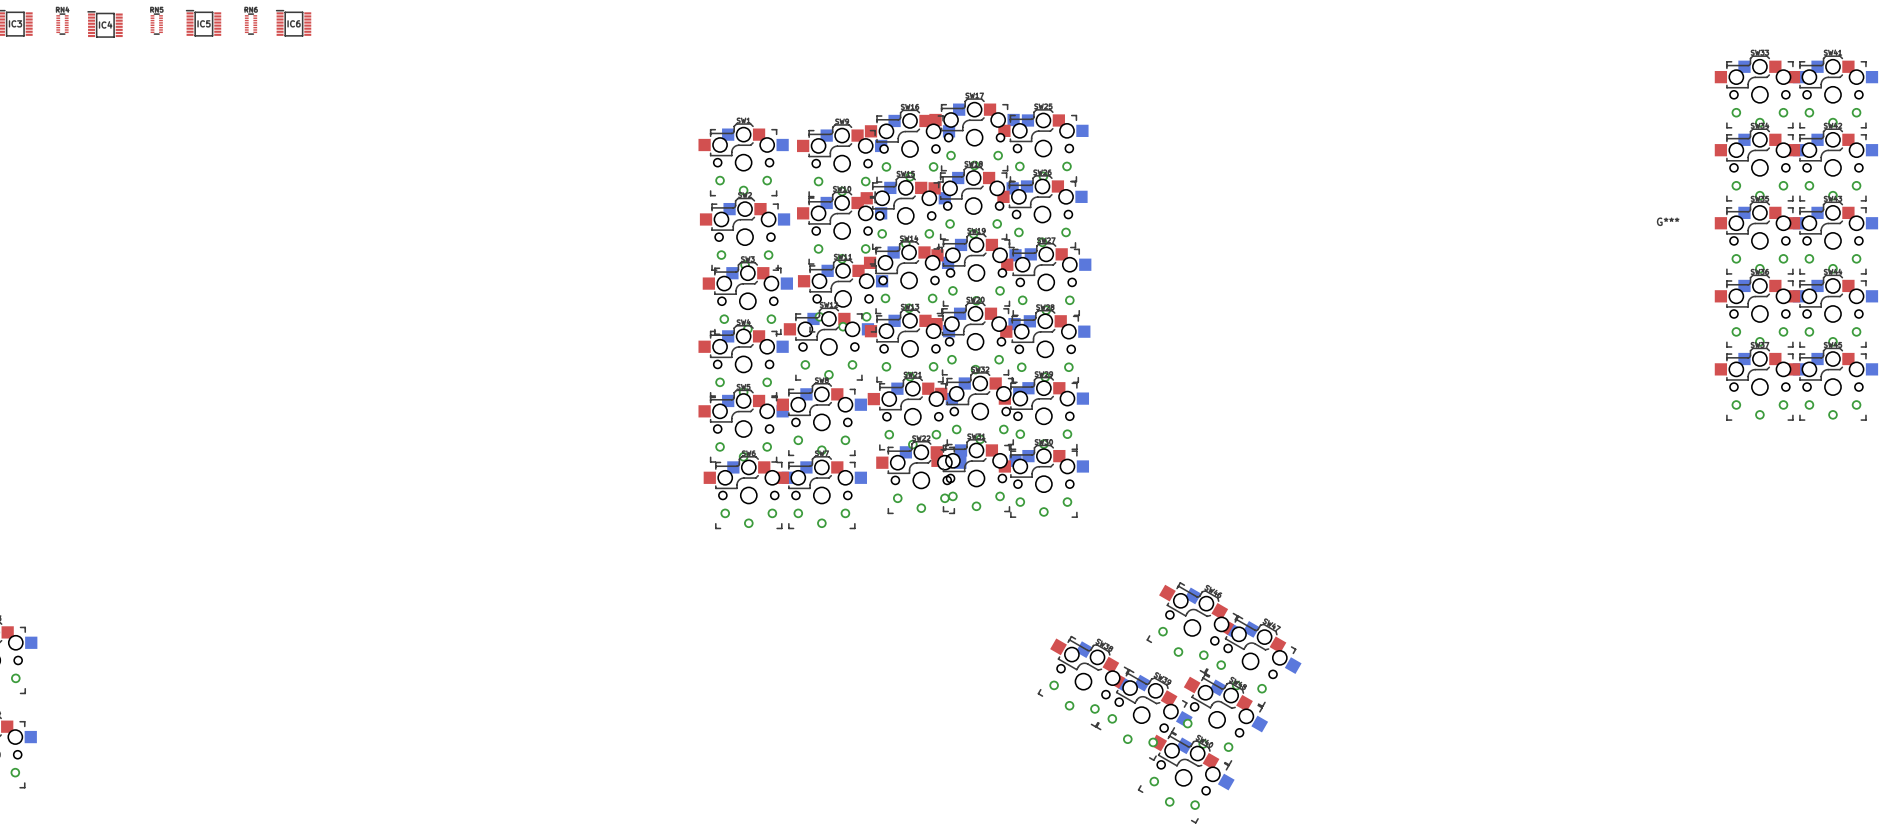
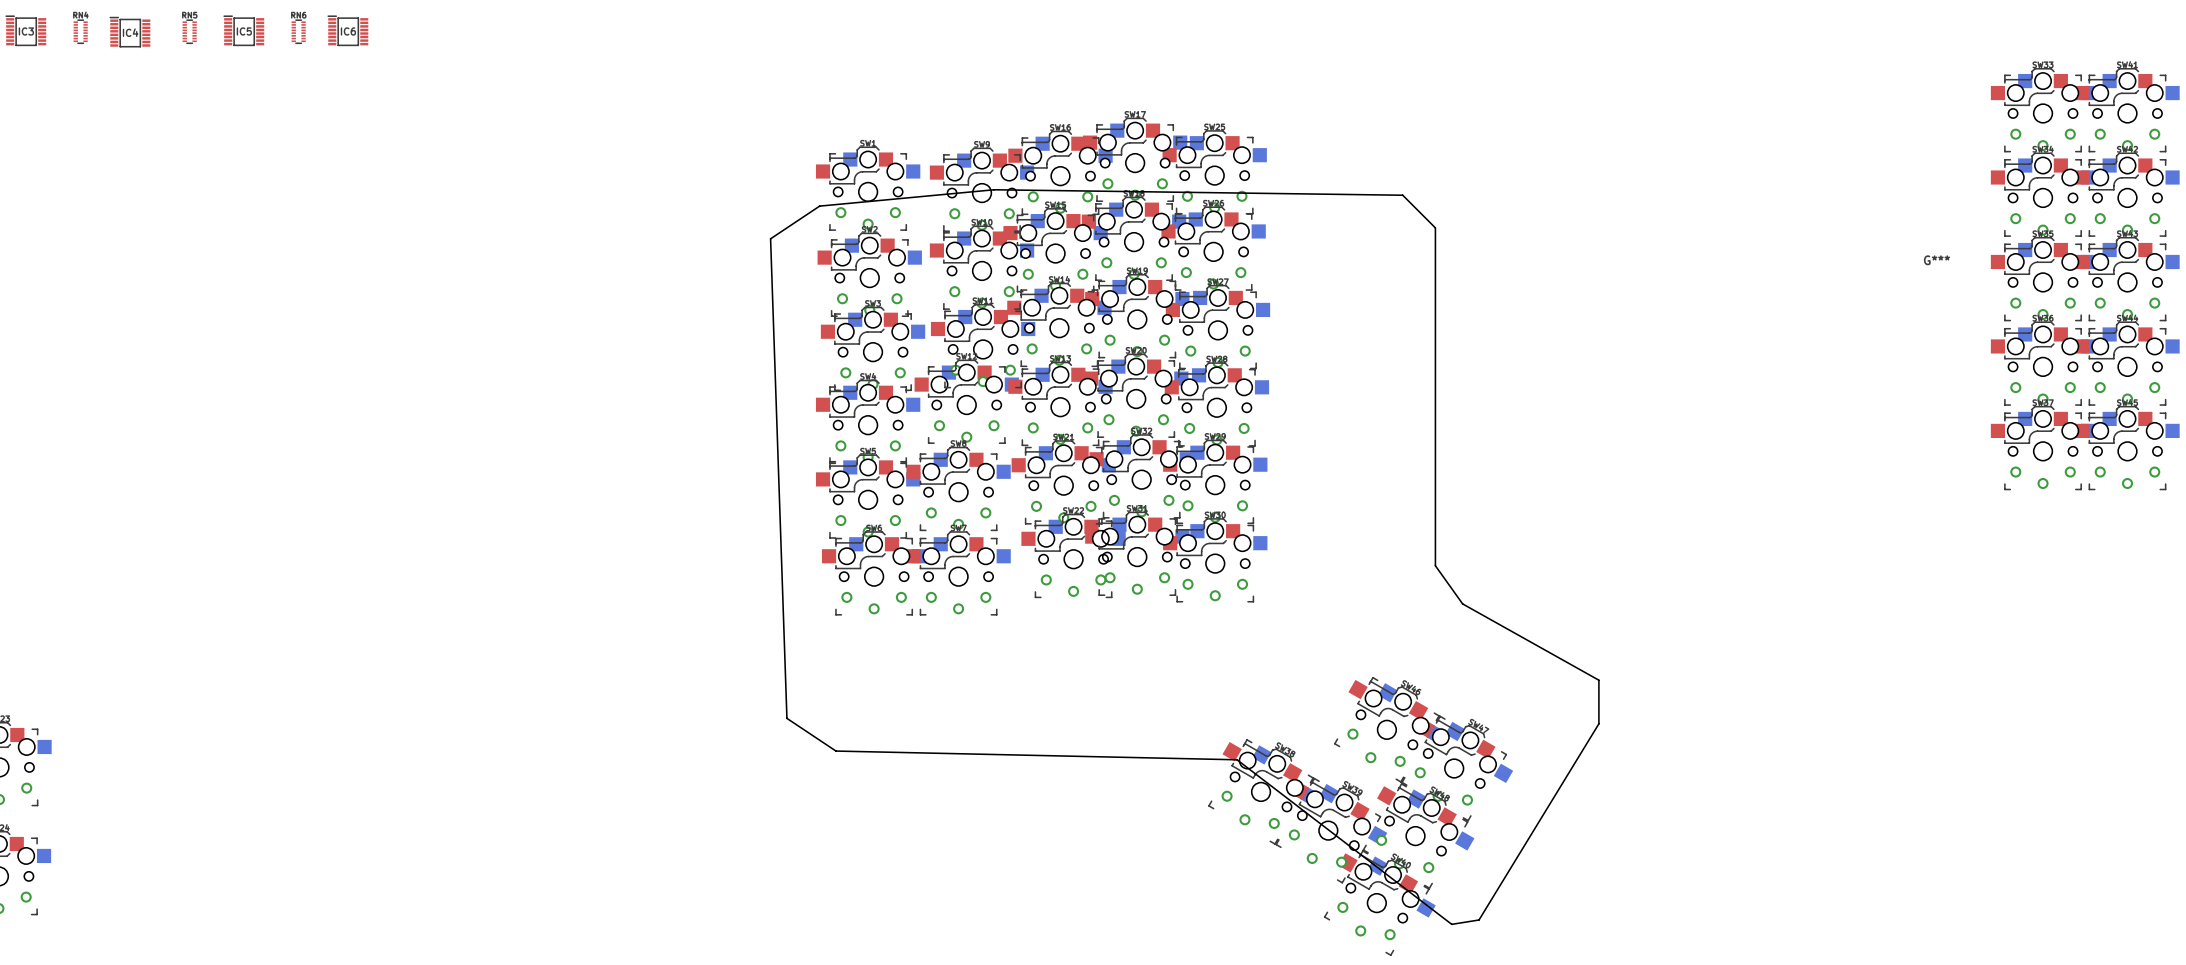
board edge: none -> (994, 189) (819, 206) (770, 238) (786, 718) (835, 751) (1237, 759) (1451, 924) (1479, 920) (1598, 723) (1598, 680) (1462, 603) (1435, 565) (1435, 227) (1402, 195) (994, 189)

